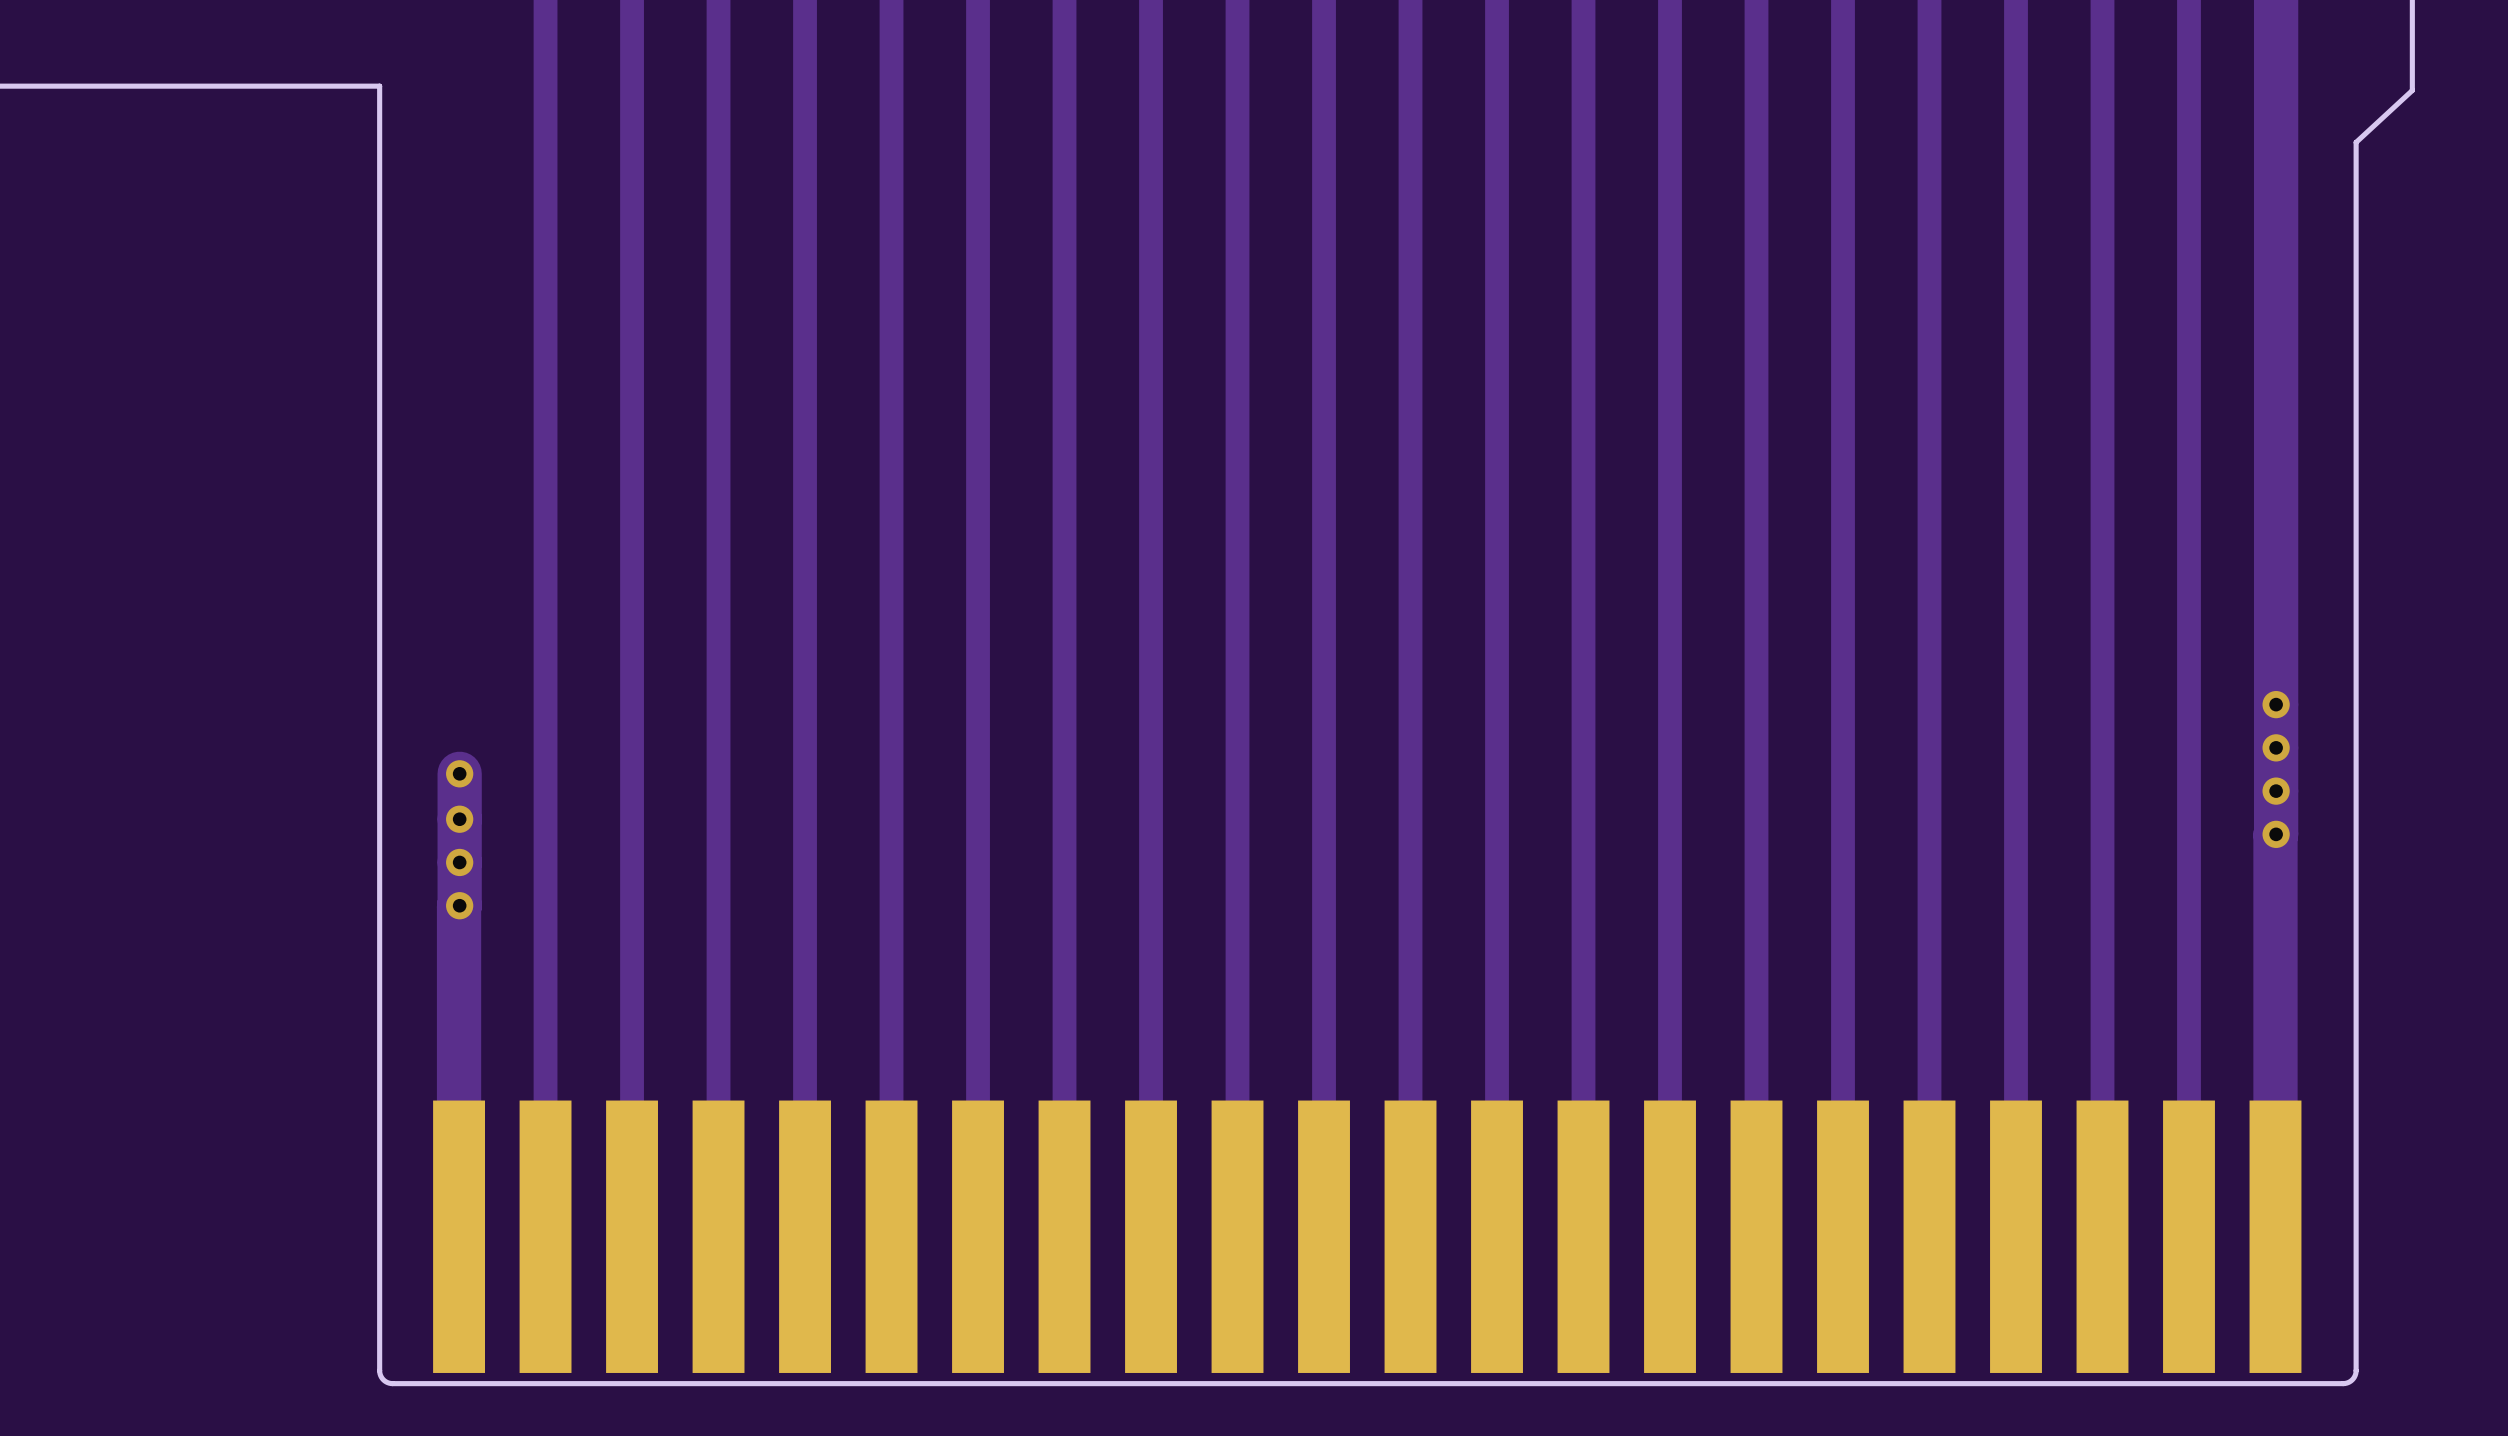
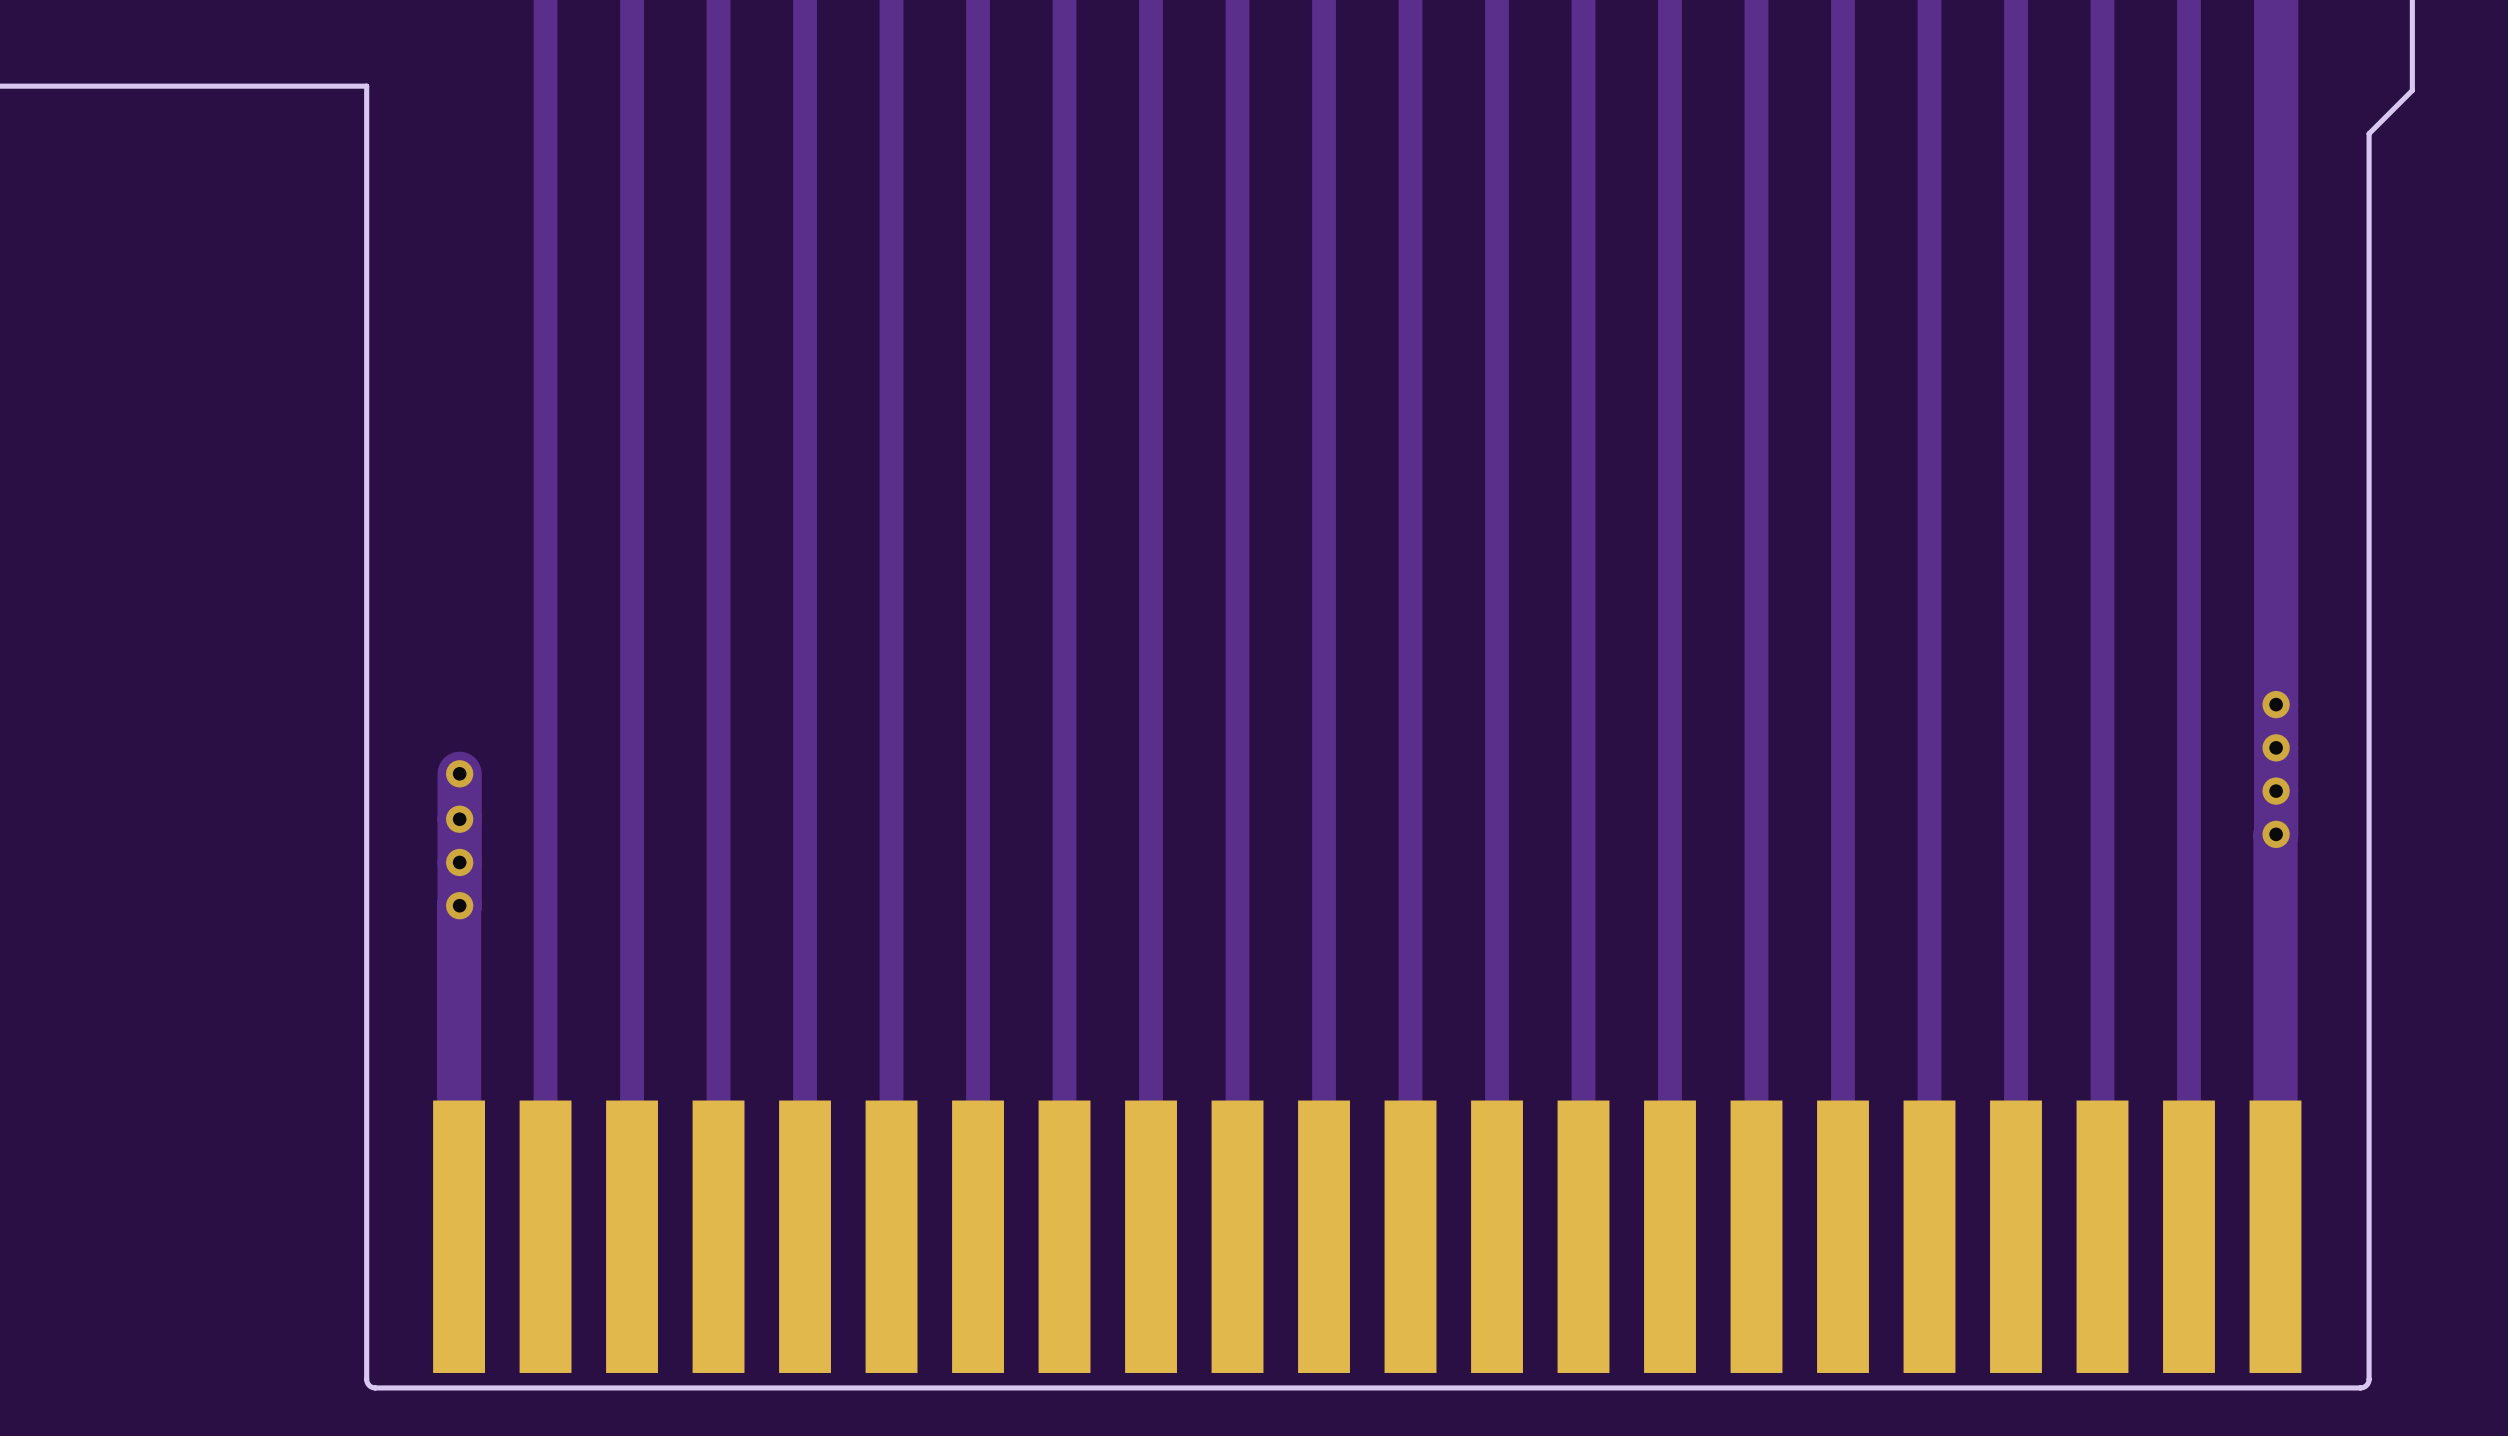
board edge: (366, 86) (379, 86) (379, 1370) (383, 1379) (392, 1383) (2343, 1383) (2349, 1381) (2354, 1377) (2356, 1370) (2356, 142) (2412, 90) -> (366, 86) (366, 1379) (369, 1385) (375, 1387) (2364, 1386) (2369, 1379) (2369, 133) (2412, 90)

